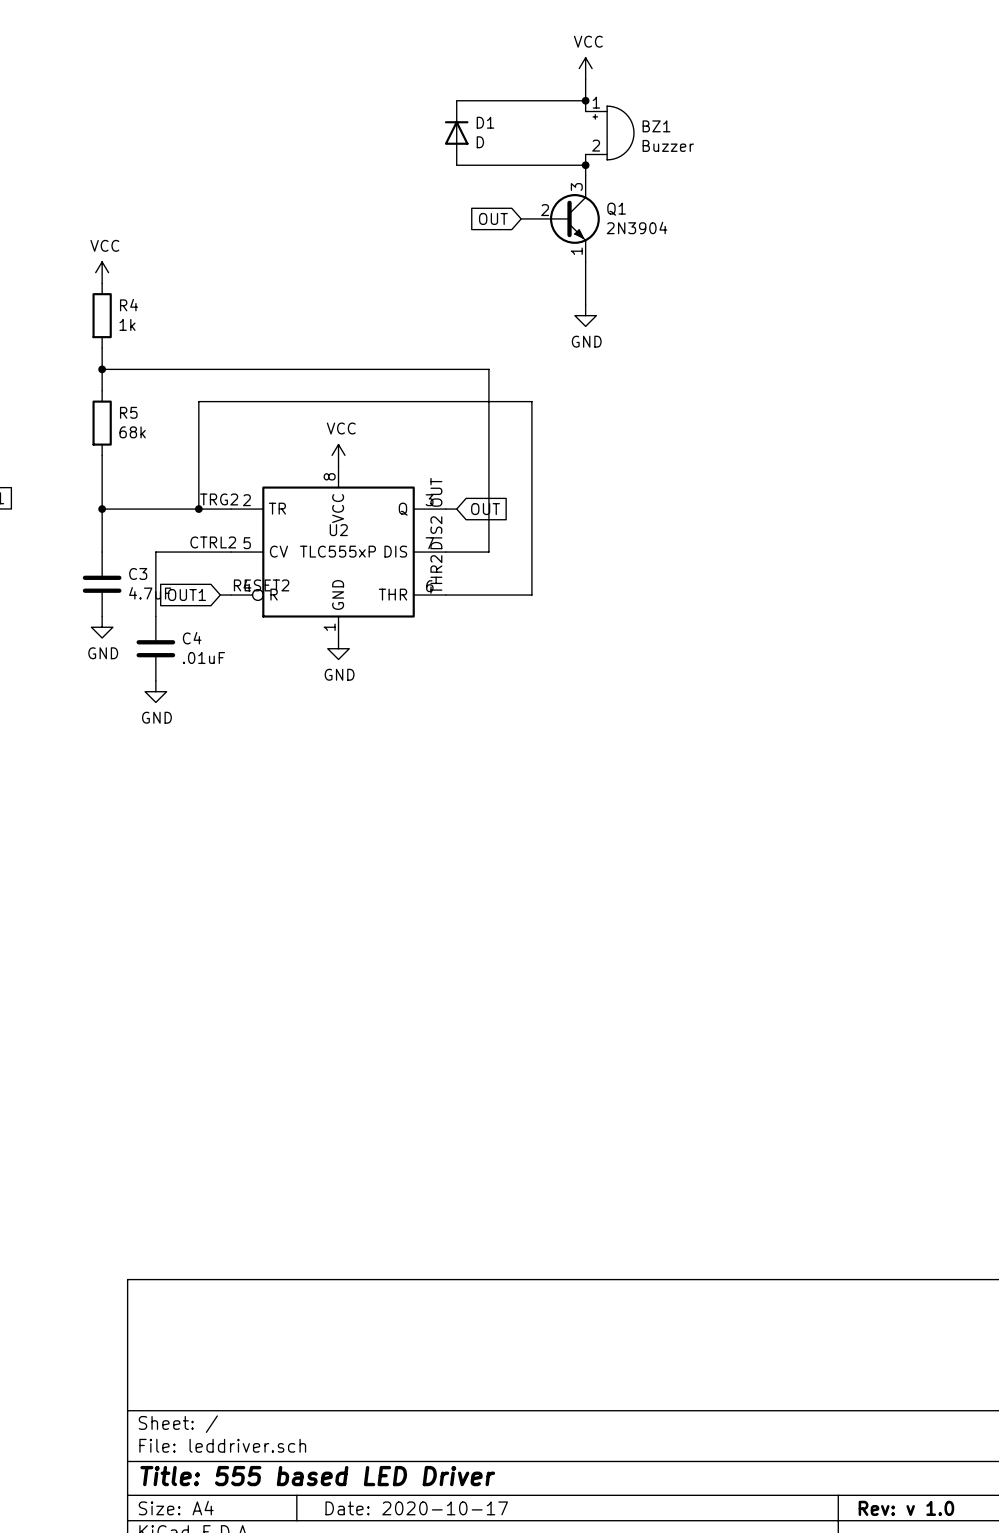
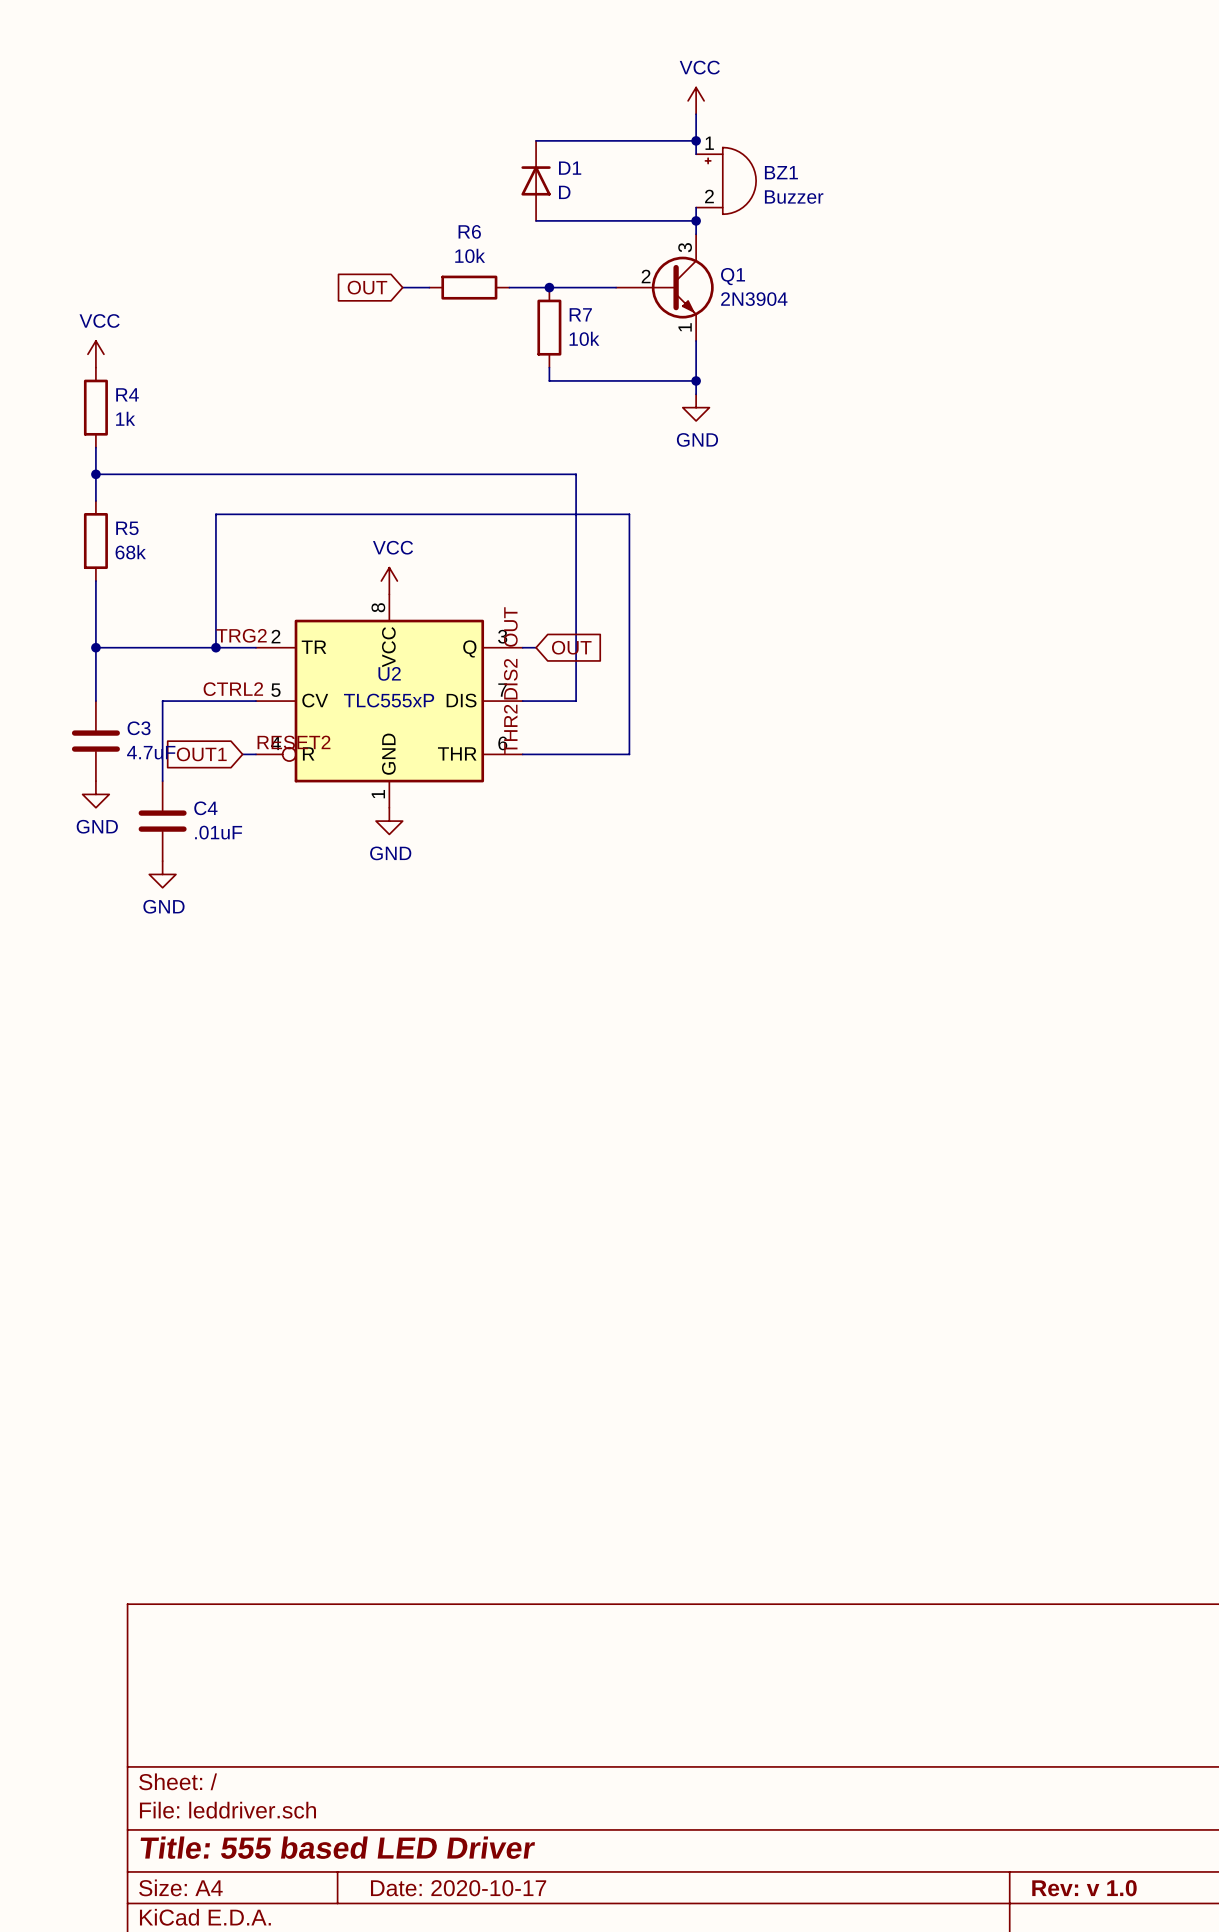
wire: none -> (402, 287) (429, 287)
R6: none -> 10k (469, 287)
wire: none -> (509, 287) (616, 287)
junction: none -> (549, 287)
global label position: OUT (493, 218) -> OUT (367, 287)
R7: none -> 10k (549, 327)
wire: none -> (549, 367) (549, 380) (696, 380)
junction: none -> (696, 380)

